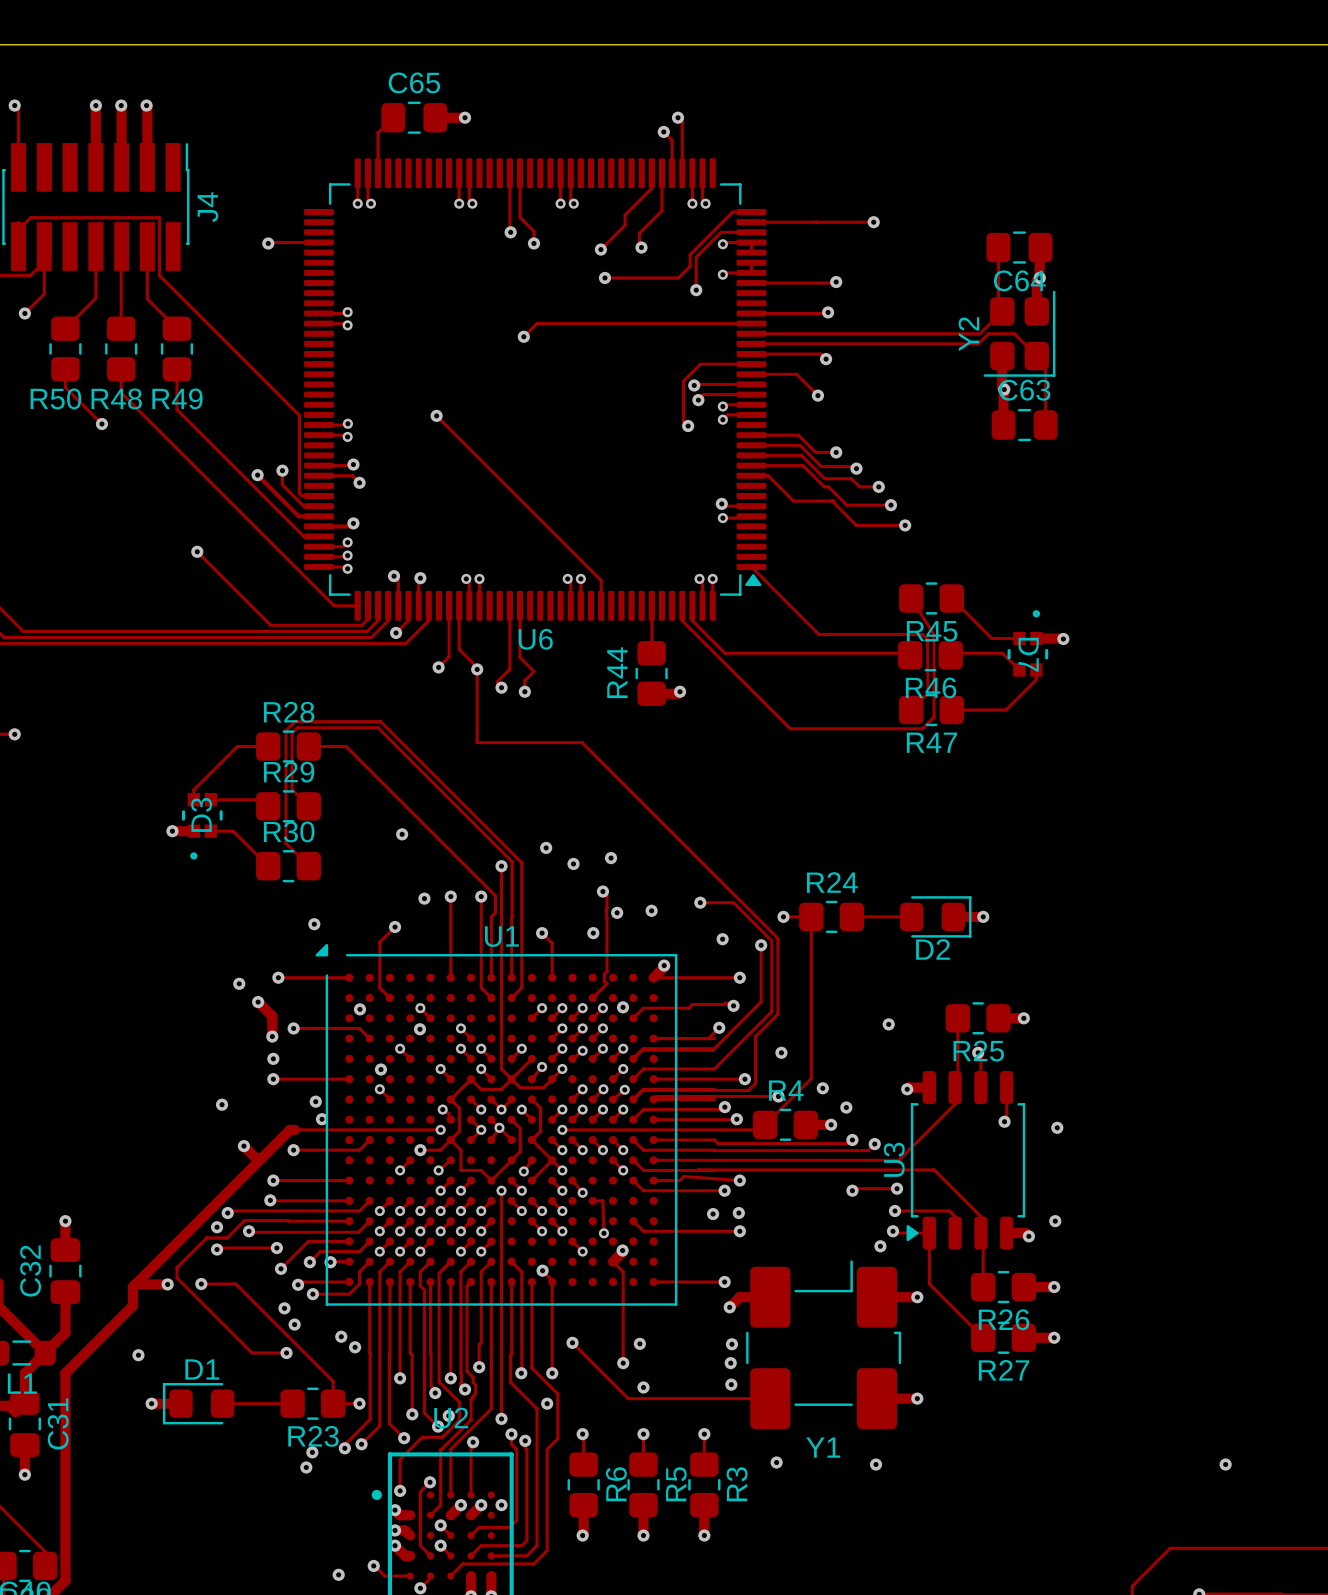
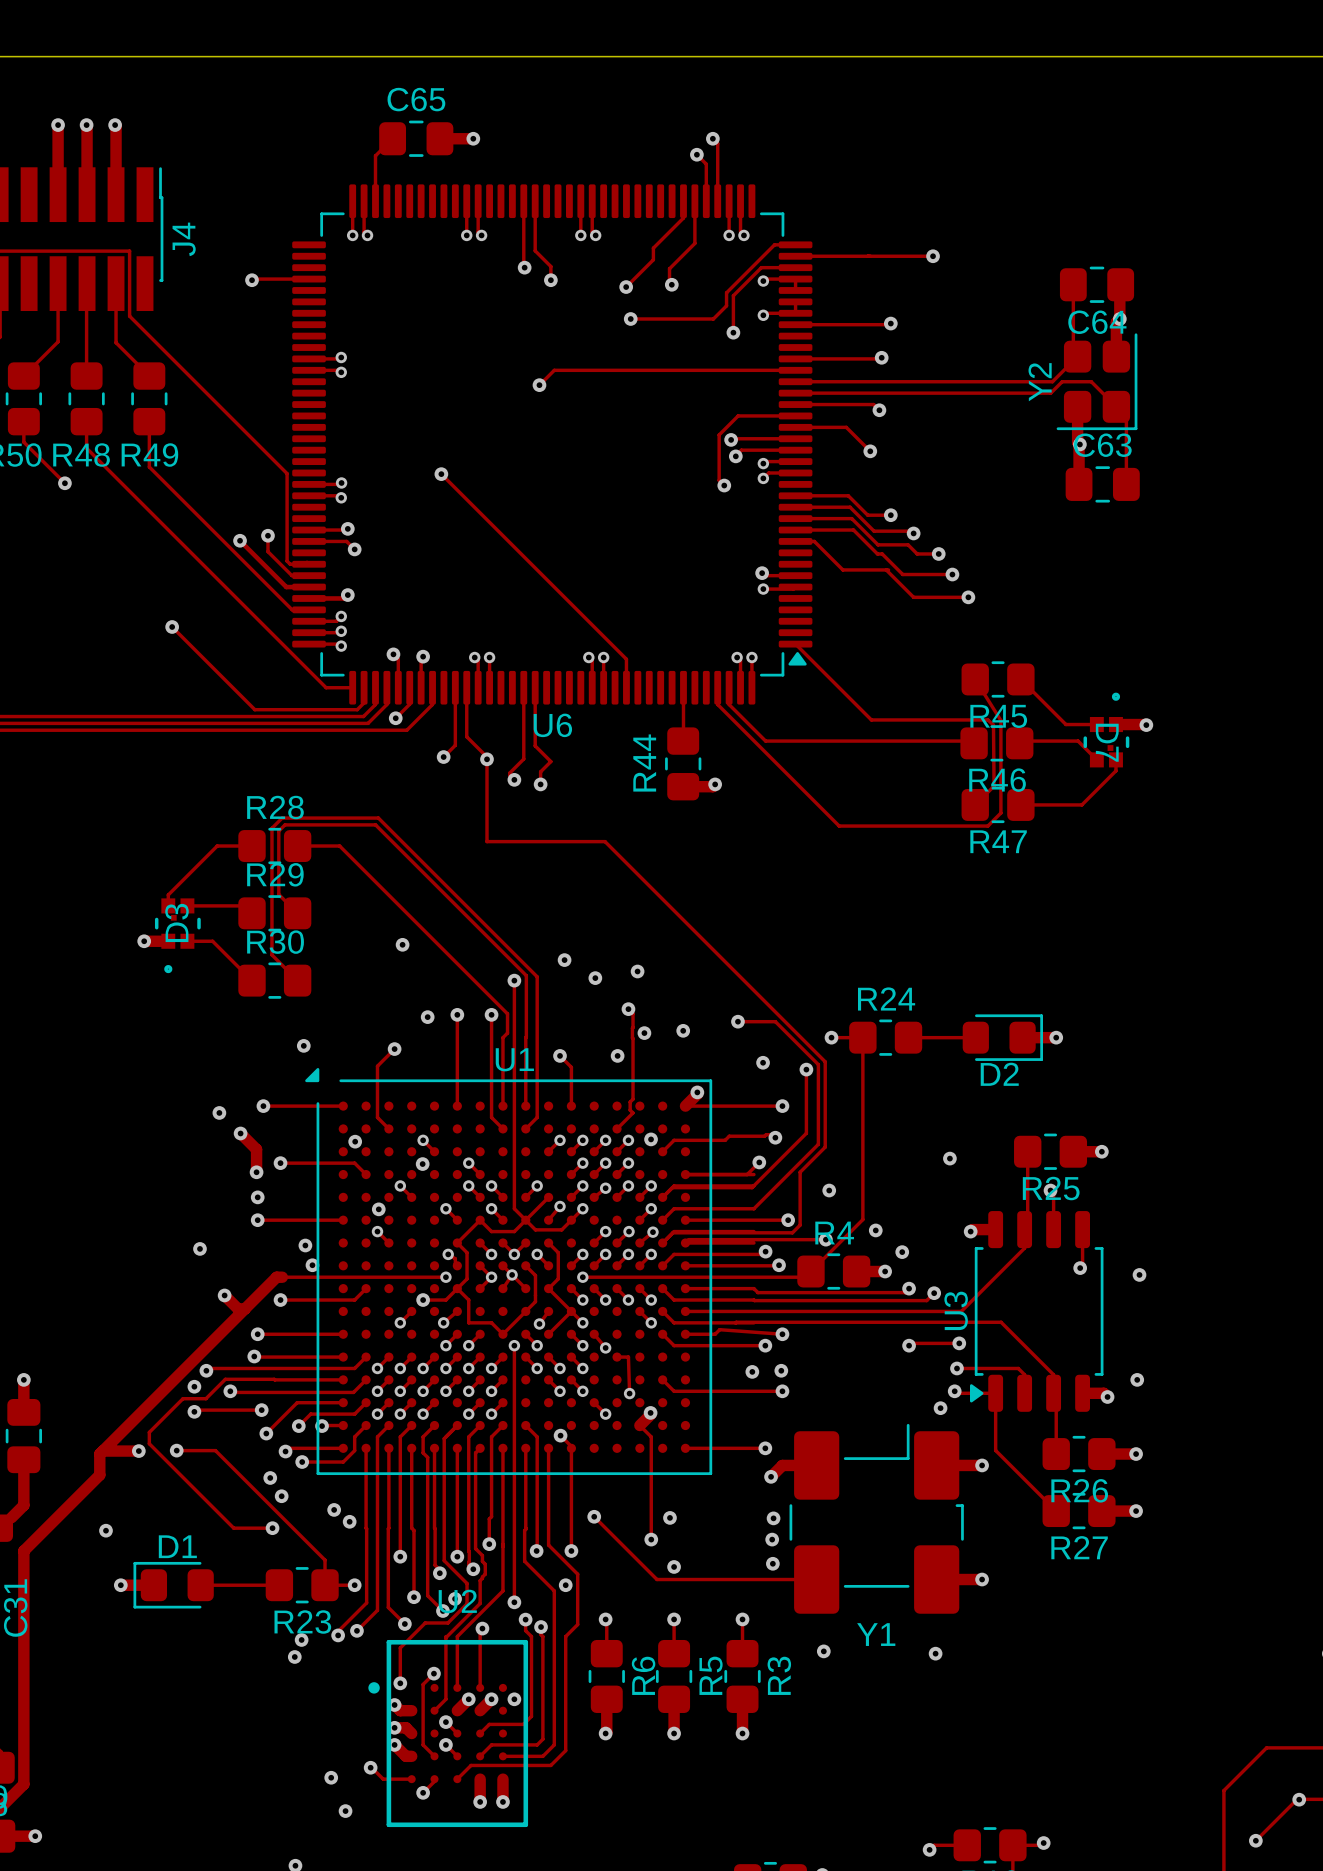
D7 footprint: [1007, 610, 1049, 677] -> [1083, 692, 1130, 768]
D3 footprint: [182, 793, 223, 860] -> [154, 898, 201, 974]

